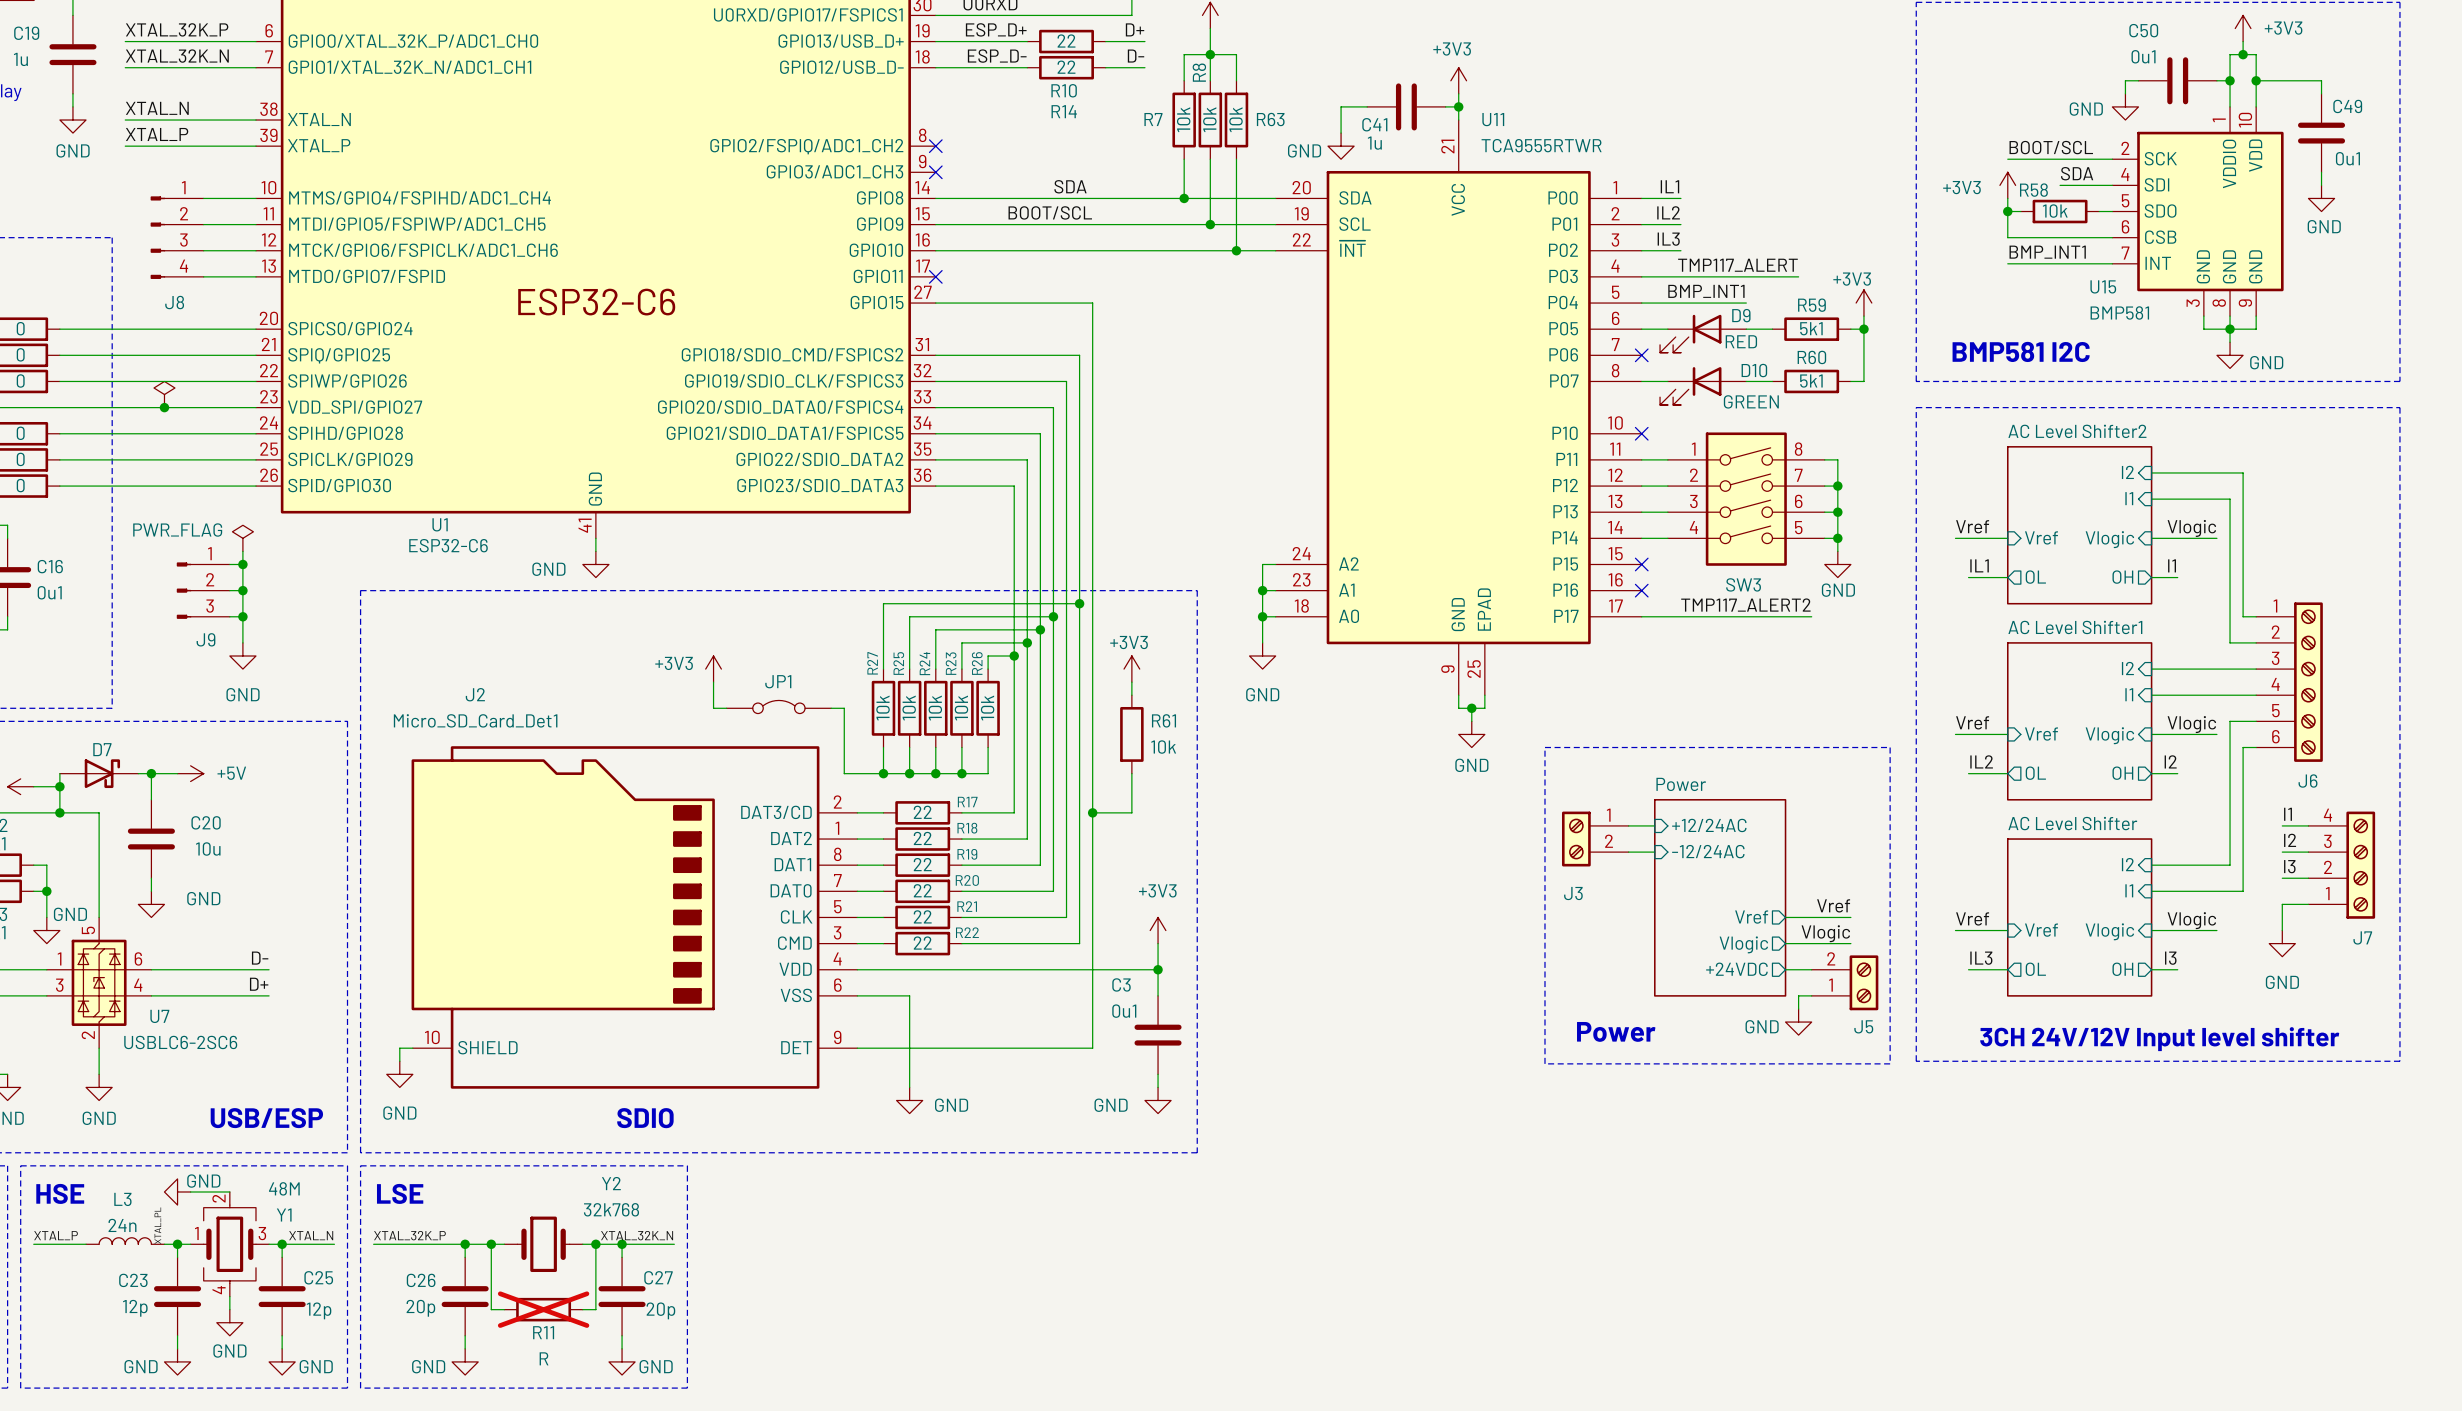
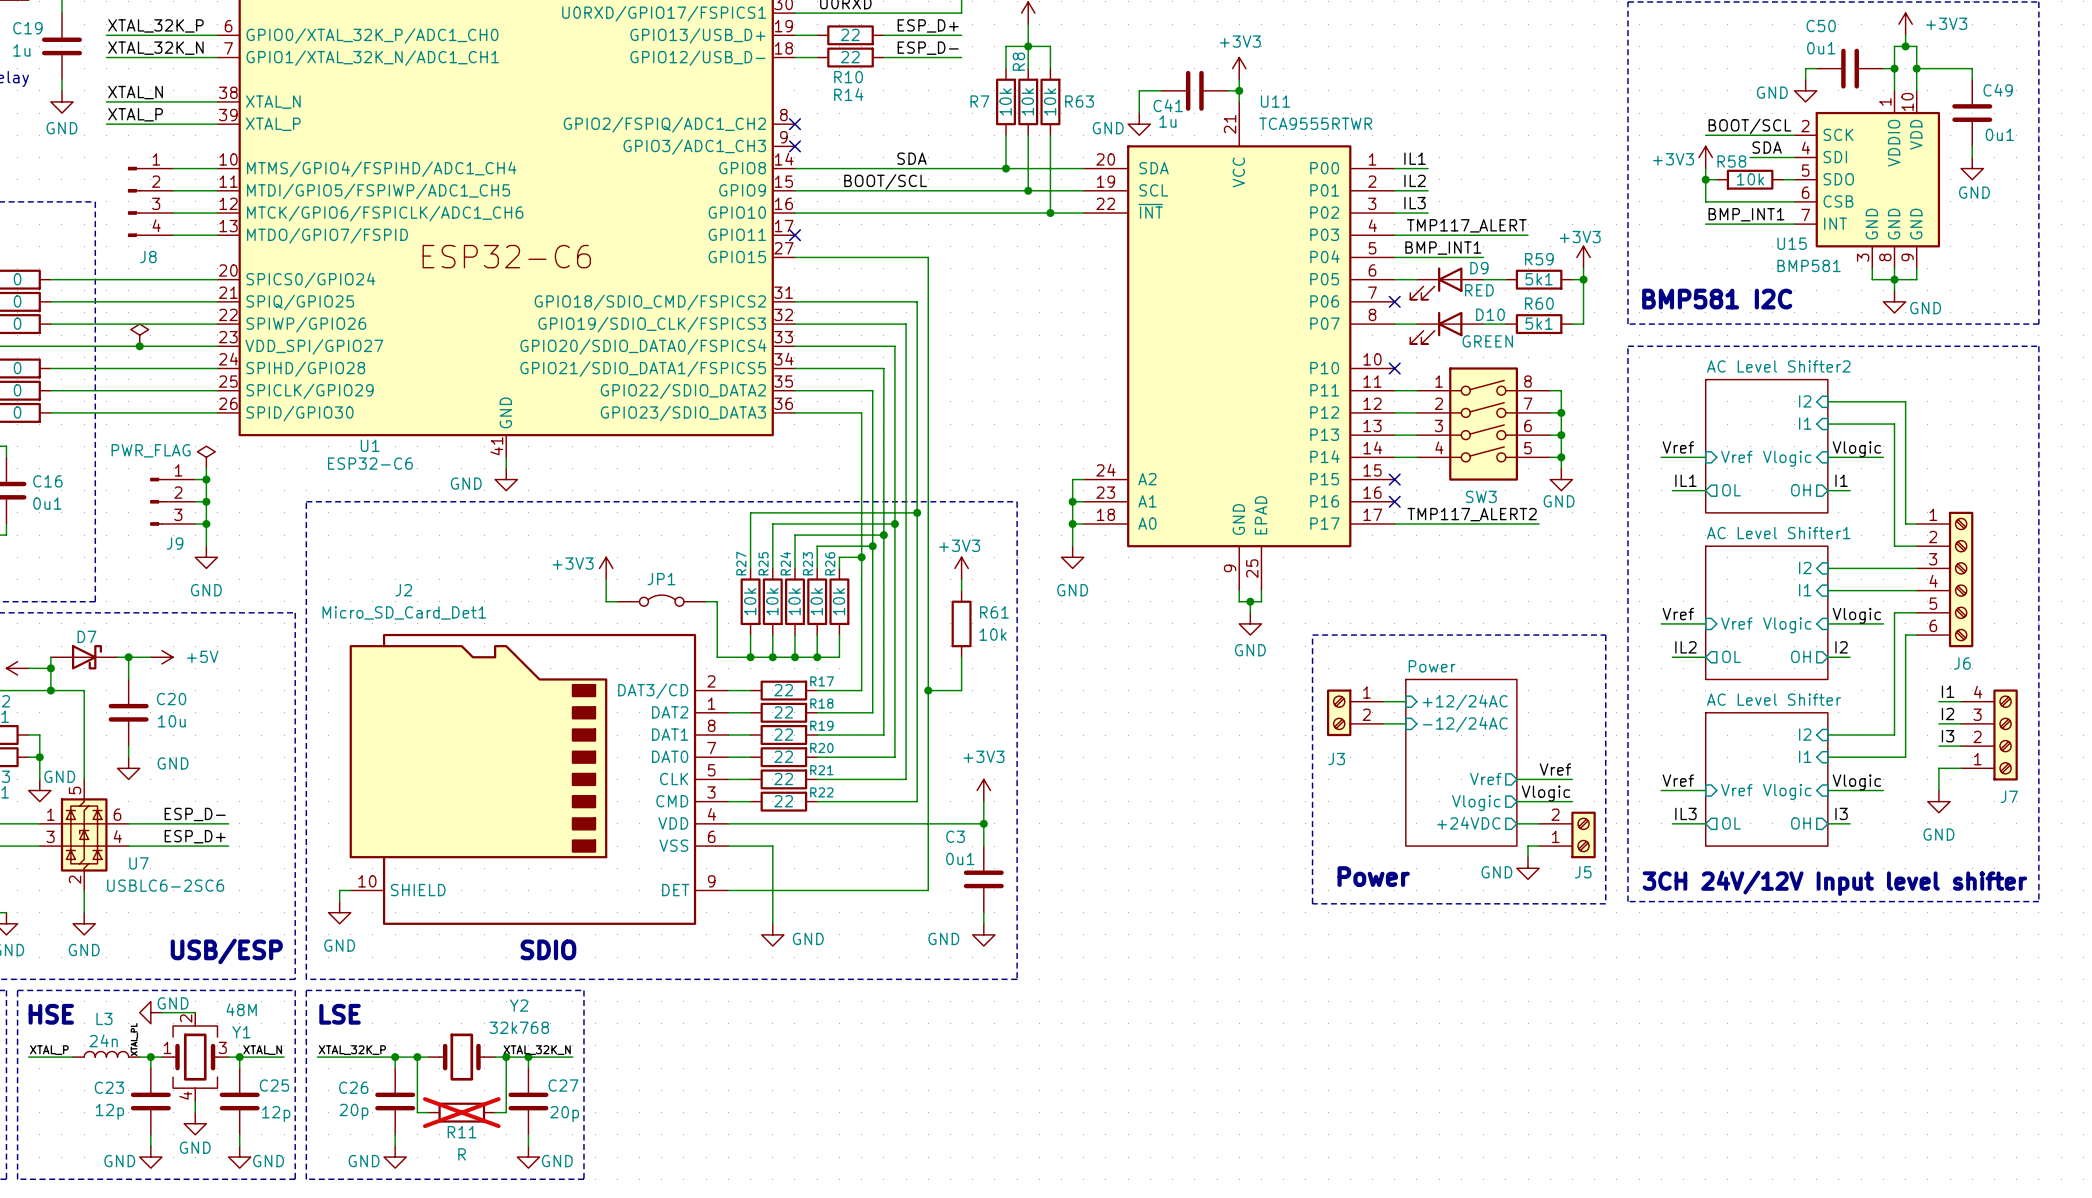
label position: ESP_D+ (996, 29) -> ESP_D+ (928, 25)
label: D+ (1135, 29) -> none
wire: (961, 41) (1027, 41) -> (883, 35) (939, 35)
R10 position: (1066, 41) -> (850, 35)
wire: (1131, 41) (1144, 41) -> none
label position: ESP_D- (997, 56) -> ESP_D- (928, 48)
label: D- (1136, 56) -> none
wire: (961, 67) (1027, 67) -> (883, 57) (939, 57)
R14 position: (1066, 67) -> (850, 57)
wire: (1131, 67) (1144, 67) -> none
label: D- (260, 958) -> ESP_D- (195, 814)
label: D+ (259, 984) -> ESP_D+ (195, 836)

